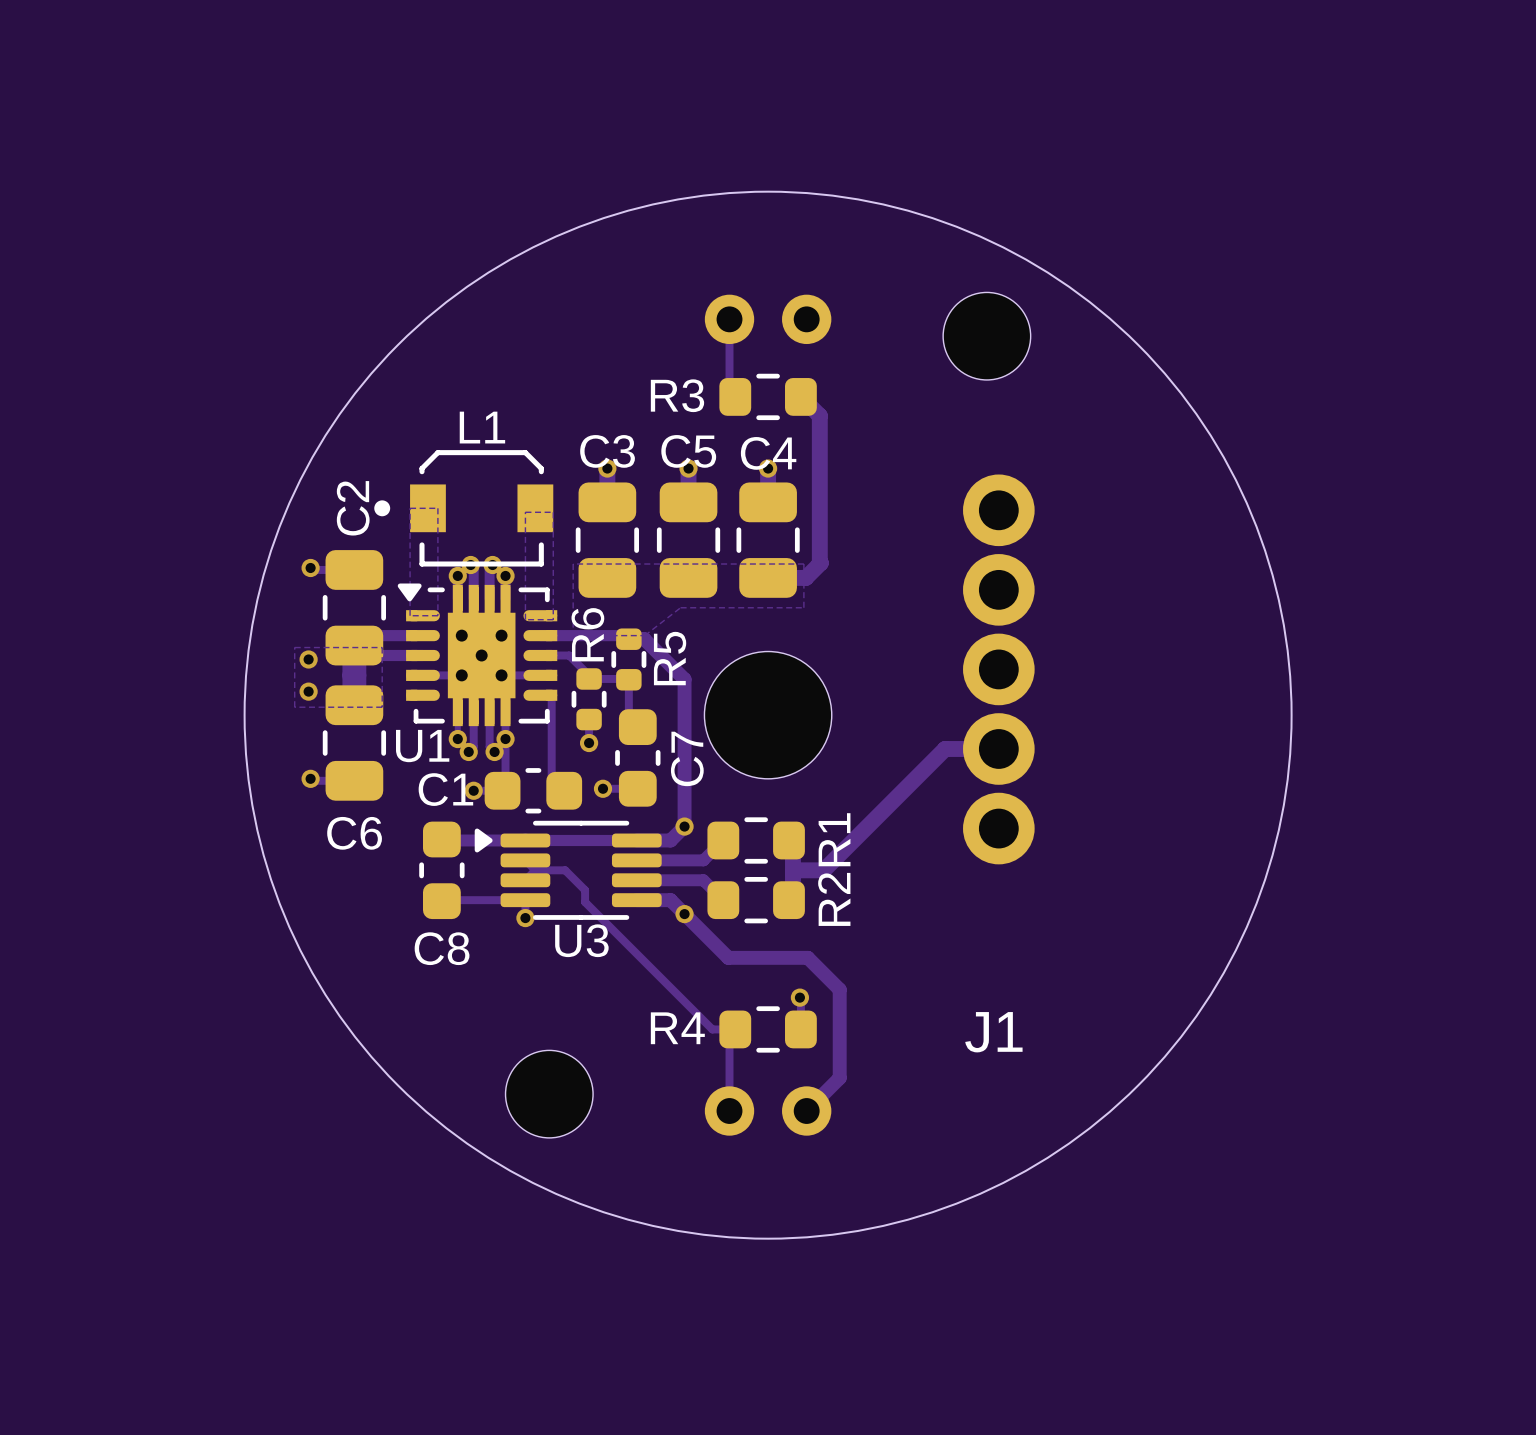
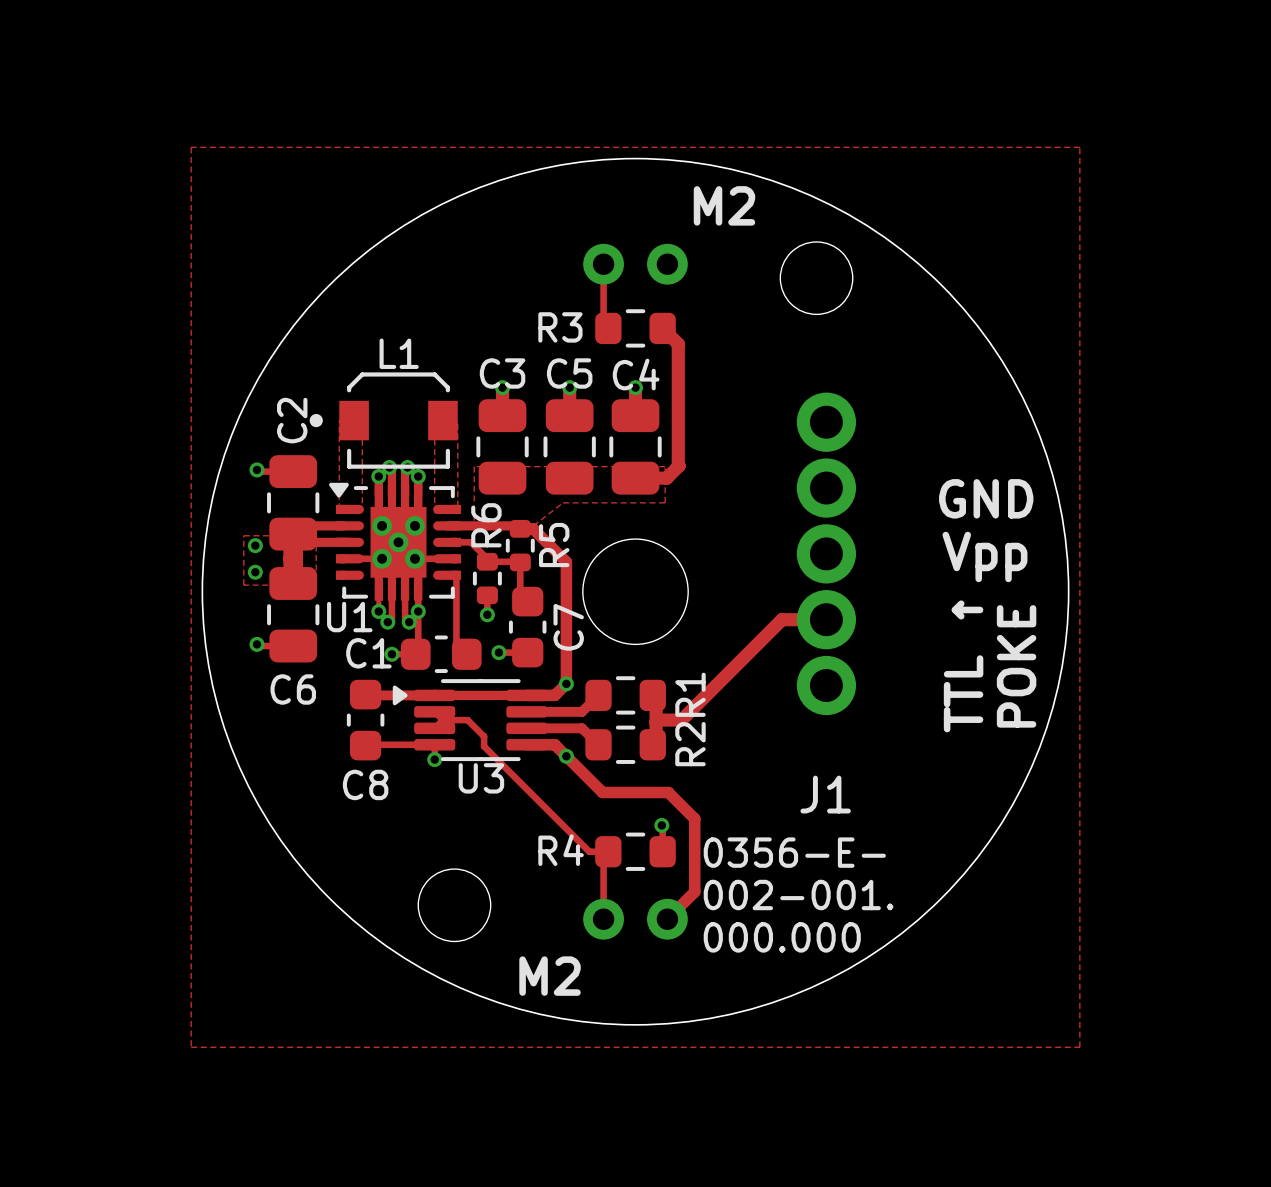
zone outline: none -> (191, 147) (191, 1047) (1079, 1047) (1079, 147) (191, 147)
text: none -> M2 (724, 205)
text: none -> GND (986, 498)
text: none -> Vpp (984, 556)
text: none -> POKE (1016, 666)
text: none -> TTL ↑ (963, 666)
text: none -> 0356-E- (794, 852)
J1 name position: J1 (993, 1032) -> J1 (825, 794)
text: none -> 002-001. (798, 895)
text: none -> 000.000 (782, 937)
text: none -> M2 (550, 976)

